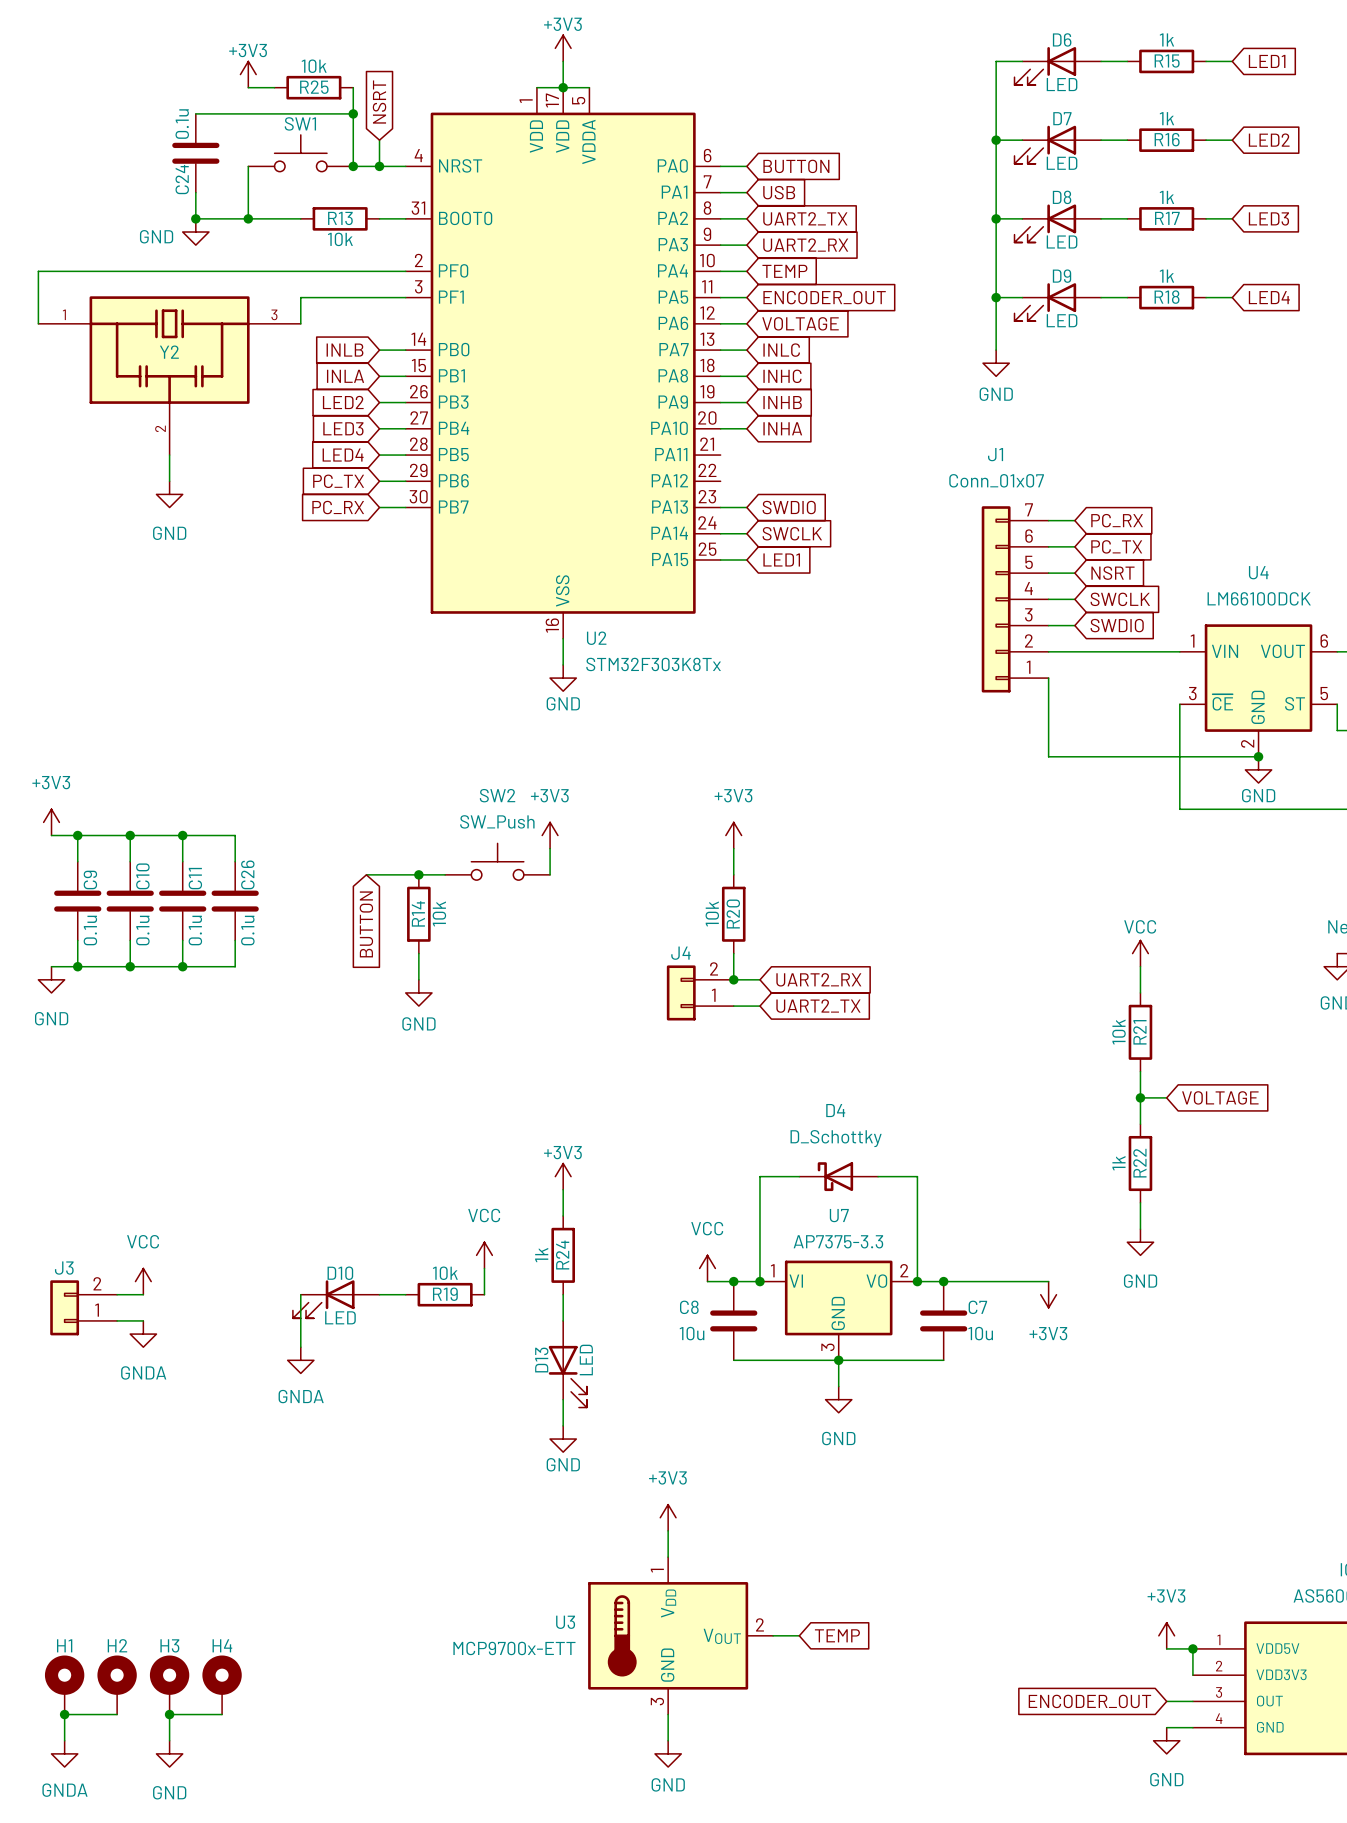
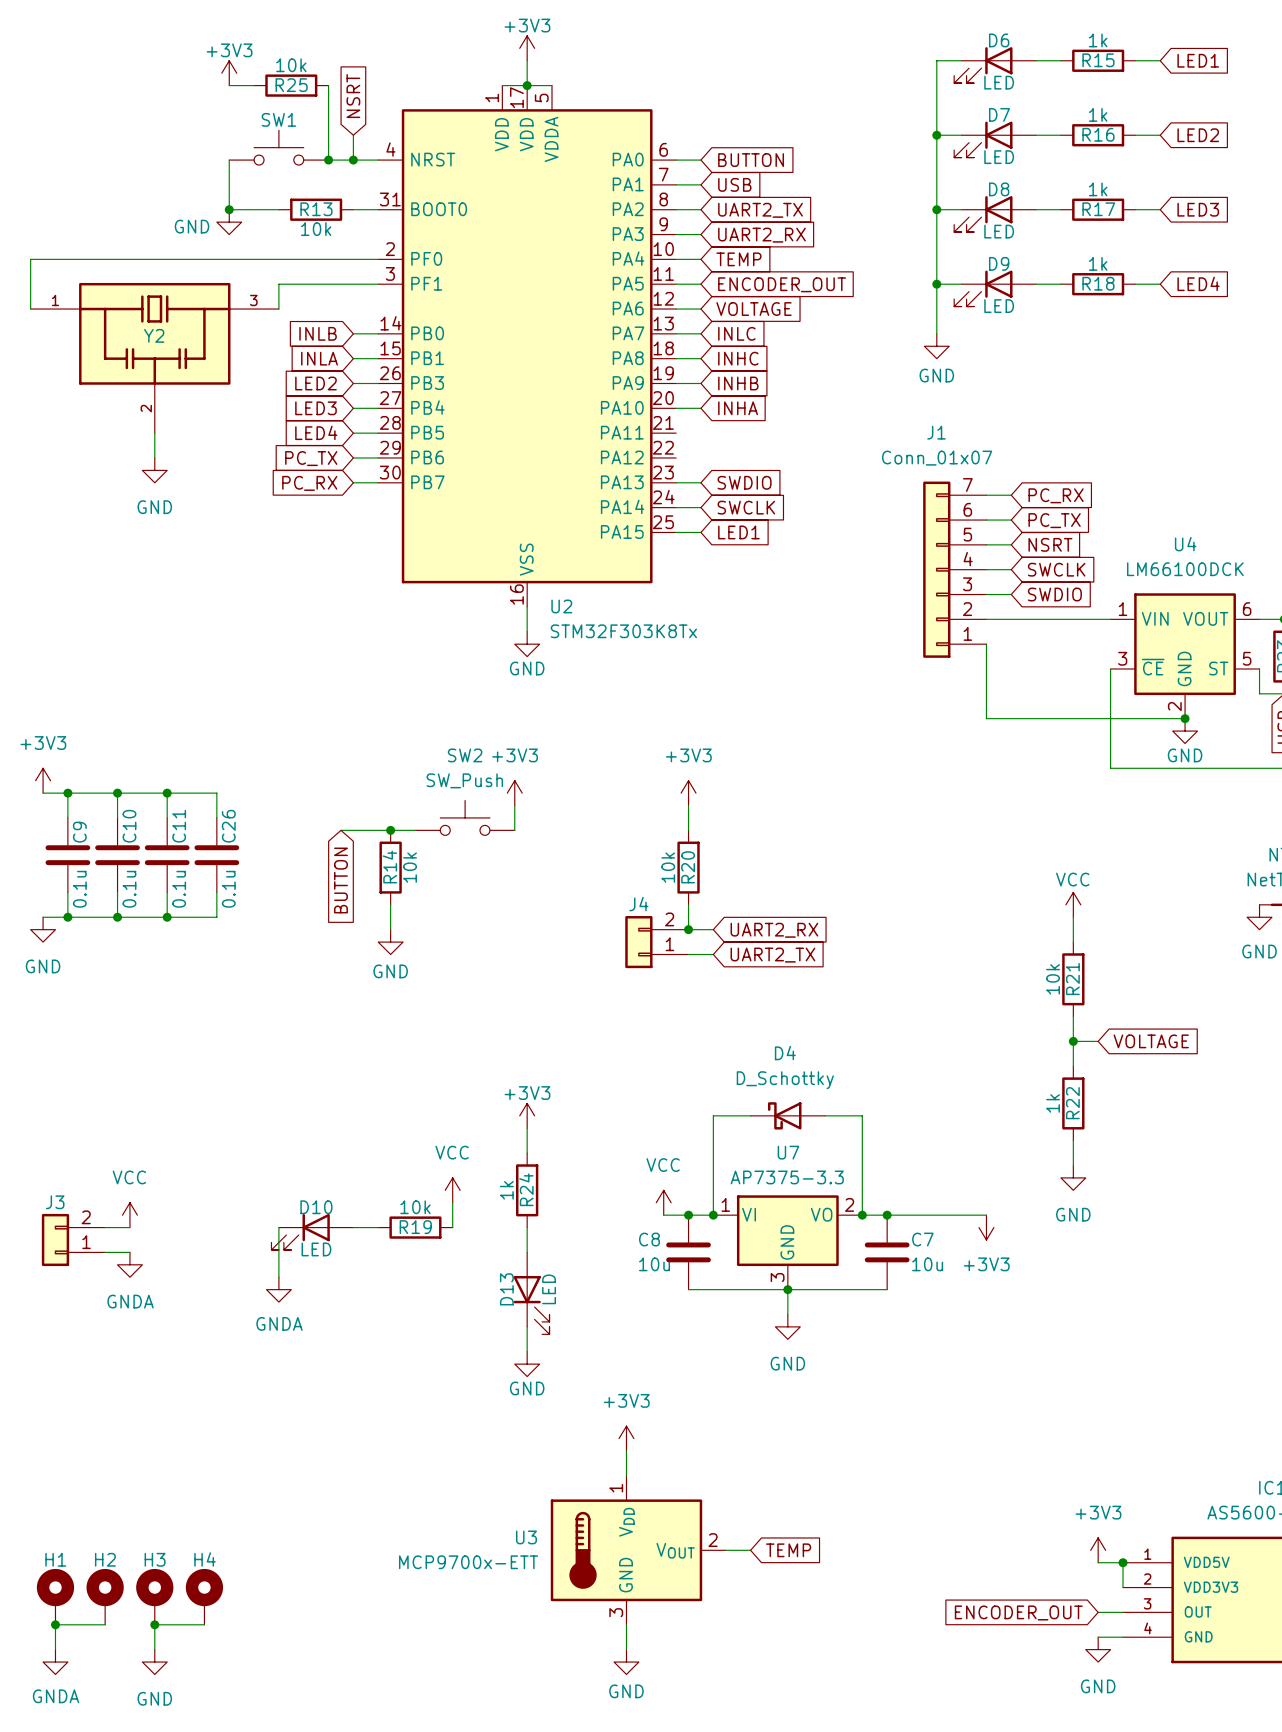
wire: (195, 113) (353, 113) -> none
junction: (353, 113) -> none
C24: 0.1u (195, 153) -> none
wire: (195, 192) (195, 218) (248, 218) -> none
junction: (195, 218) -> none
power symbol position: GND (195, 232) -> GND (229, 222)

